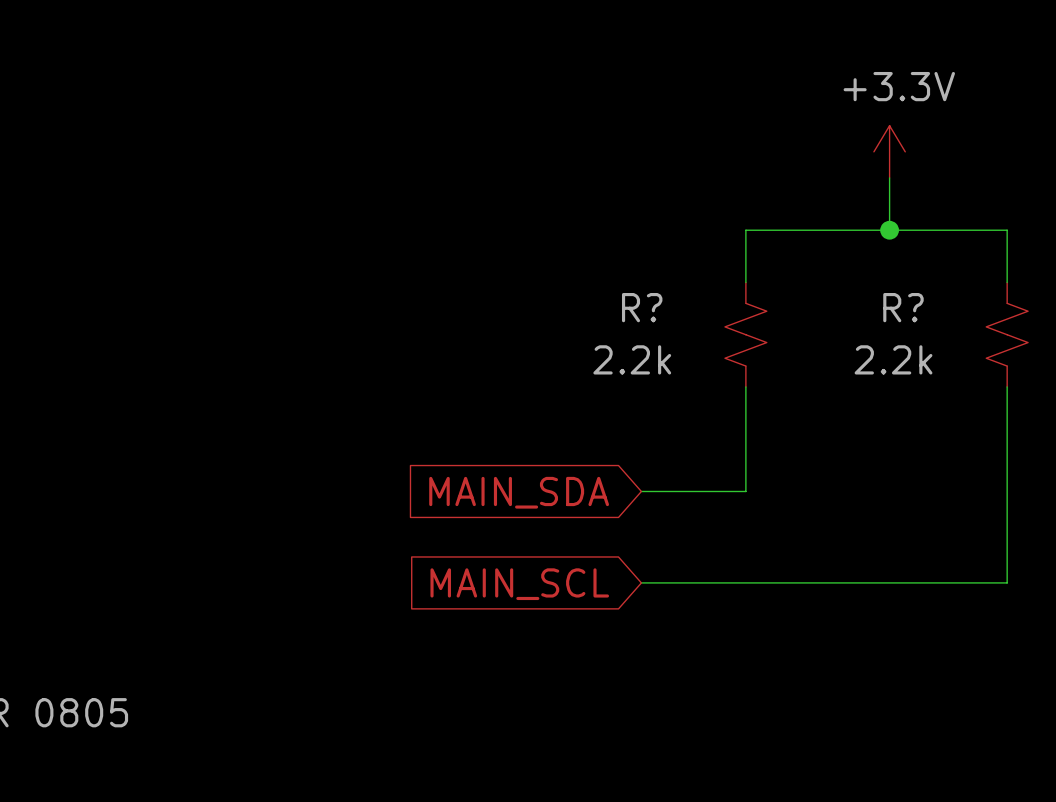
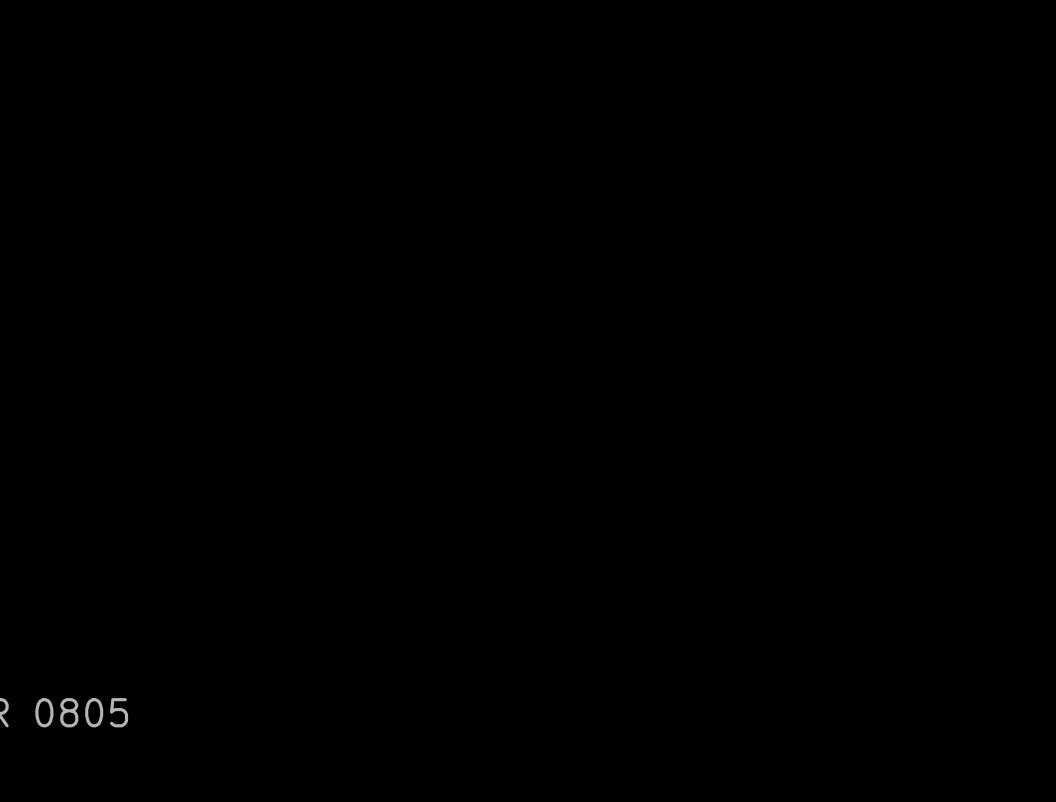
power symbol: +3.3V (889, 151) -> none
wire: (889, 177) (889, 230) -> none
junction: (889, 230) -> none
wire: (745, 282) (745, 230) (1007, 230) (1007, 282) -> none
R?: 2.2k (745, 334) -> none
R?: 2.2k (1007, 334) -> none
wire: (745, 386) (745, 491) (641, 491) -> none
wire: (1007, 386) (1007, 582) (641, 582) -> none
global label: MAIN_SDA (519, 492) -> none
global label: MAIN_SCL (519, 584) -> none

